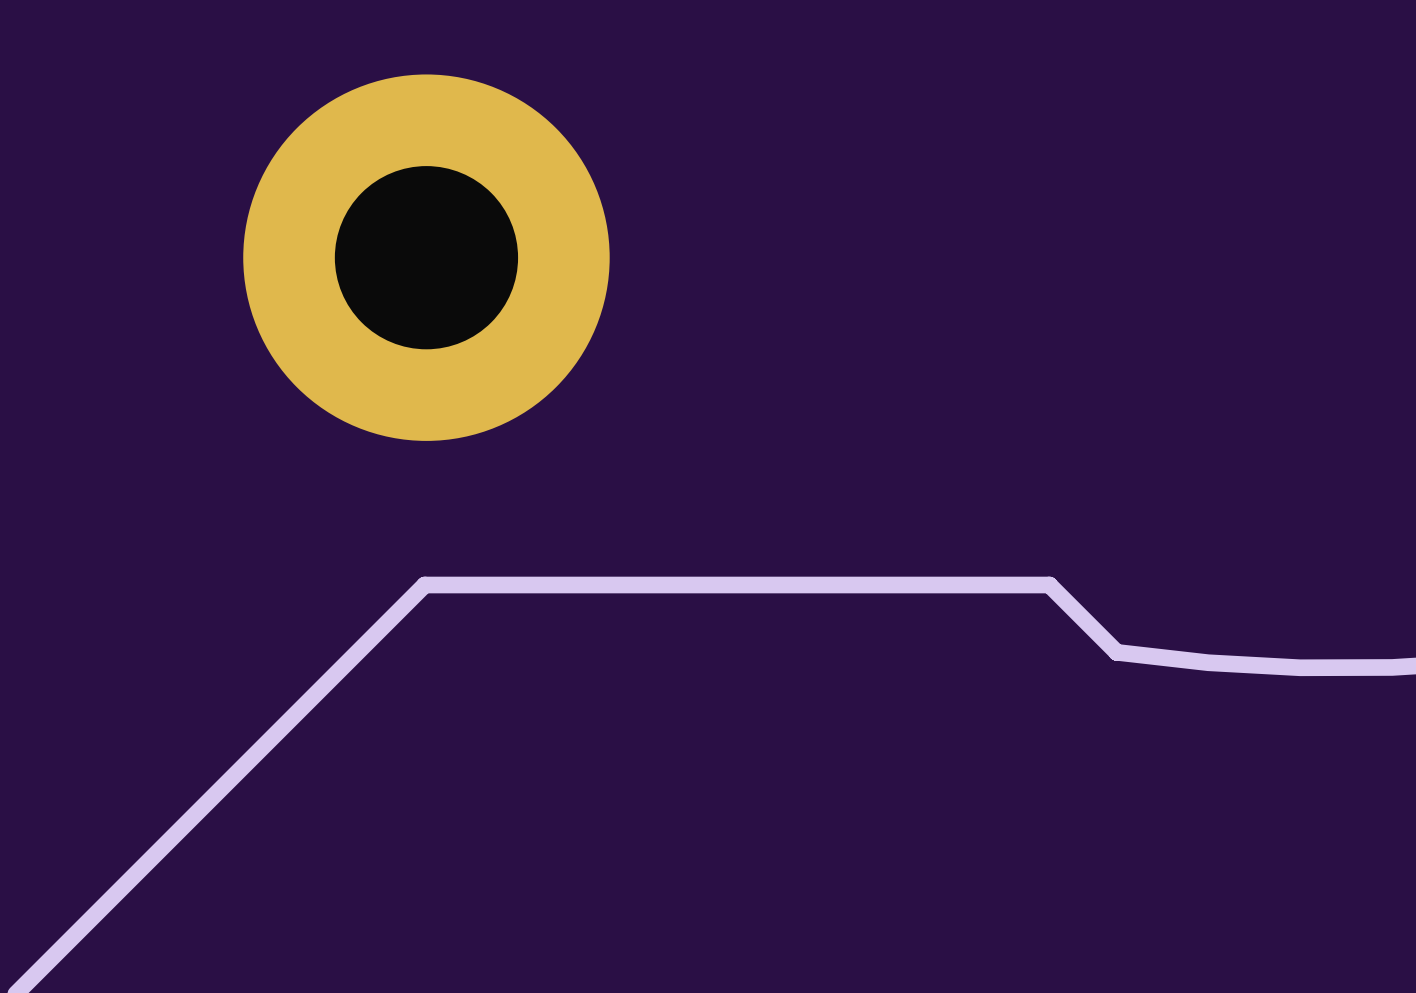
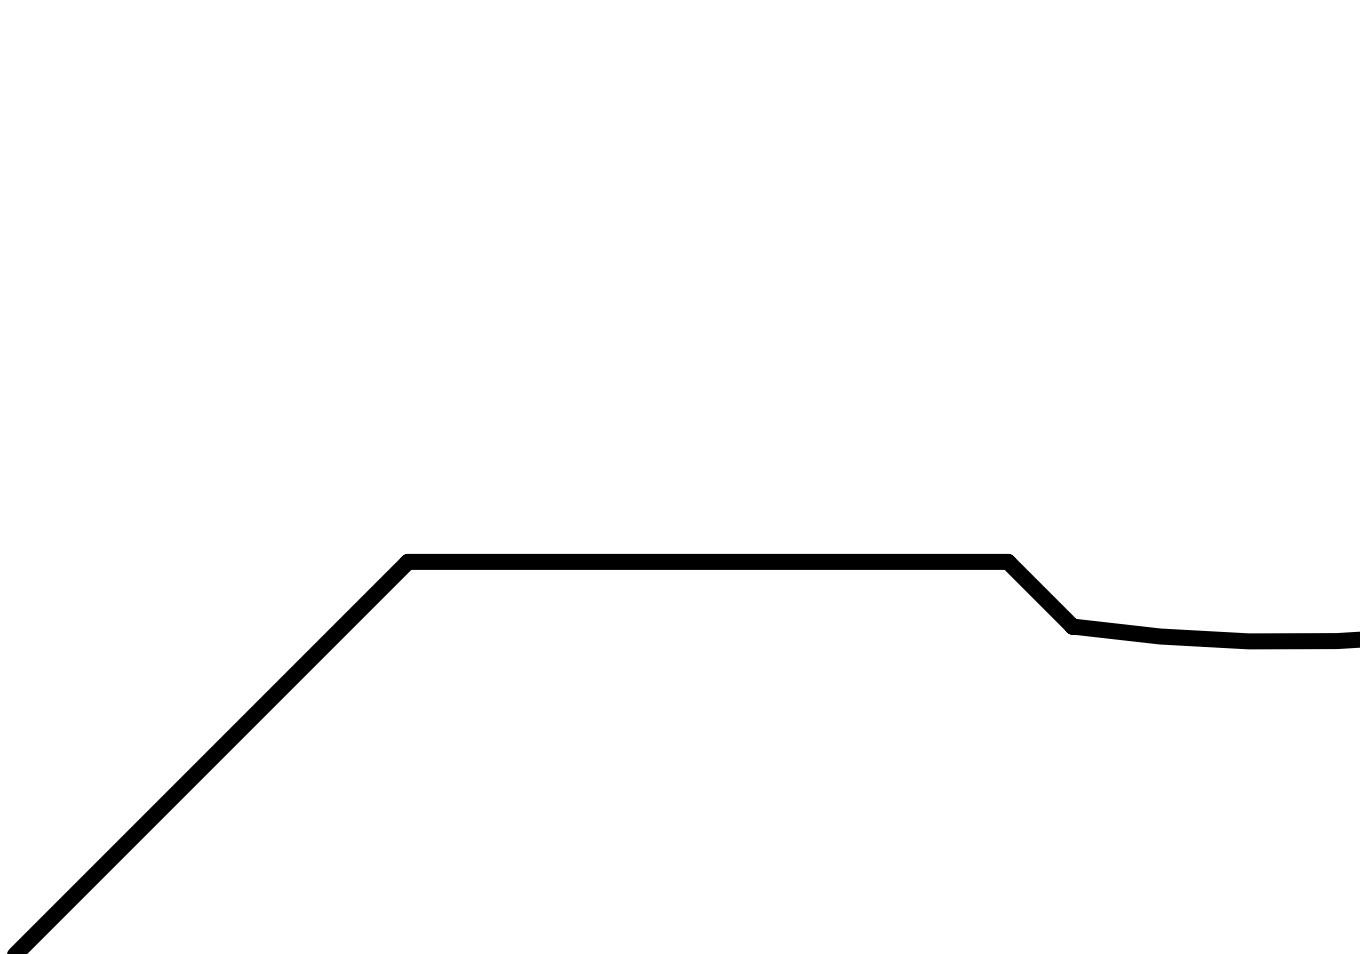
part: (426, 257) -> none

